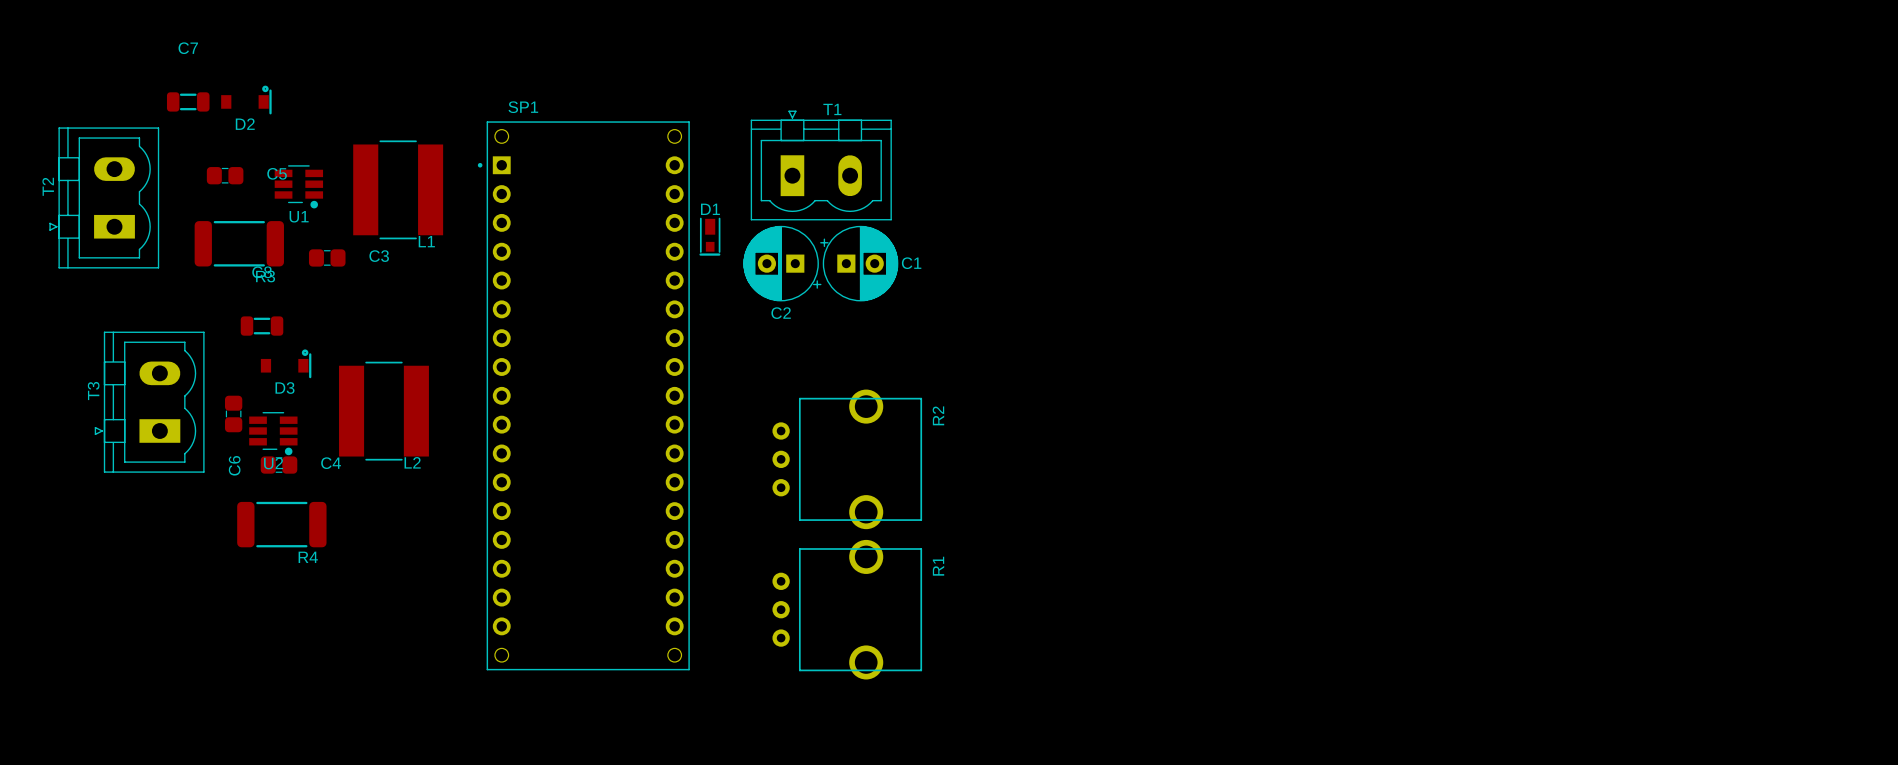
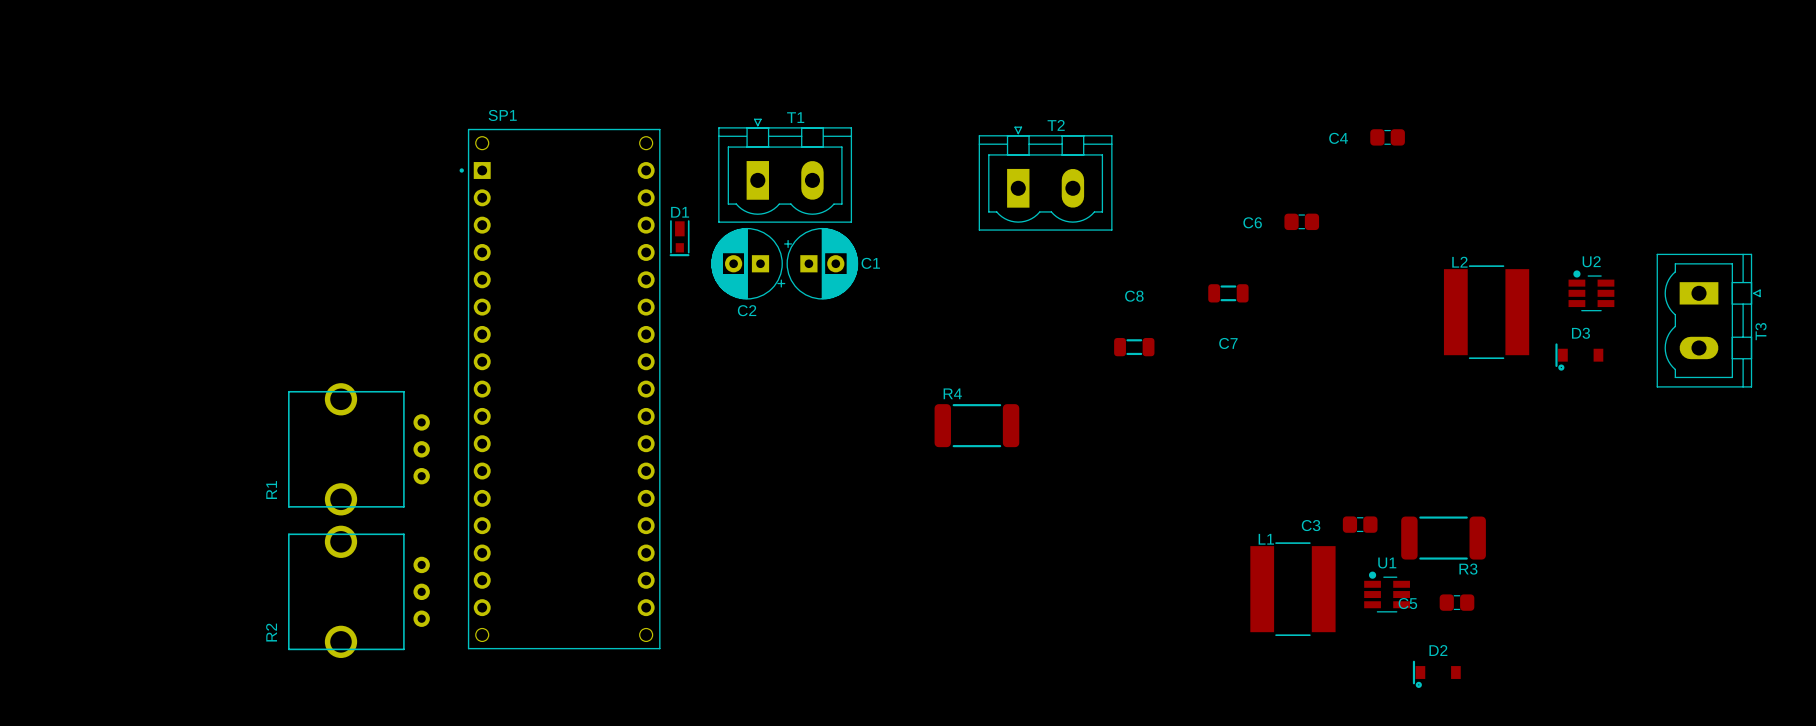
C7 name position: C7 (188, 48) -> C7 (1228, 343)
D2 rotation: 0° (246, 100) -> 180° (1436, 674)
D2 position: (246, 100) -> (1436, 674)
C7 position: (188, 101) -> (1228, 293)
C5 name position: C5 (277, 173) -> C5 (1407, 603)
C5 position: (225, 175) -> (1456, 602)
U1 rotation: 0° (298, 186) -> 180° (1387, 592)
U1 position: (298, 186) -> (1387, 592)
L1 position: (398, 189) -> (1292, 589)
T2 rotation: 0° (104, 197) -> 90° clockwise (1045, 178)
T2 position: (104, 197) -> (1045, 178)
L1 name position: L1 (426, 241) -> L1 (1266, 539)
R3 position: (239, 243) -> (1443, 538)
C3 name position: C3 (379, 256) -> C3 (1311, 525)
C3 position: (327, 257) -> (1360, 524)
C8 position: (262, 326) -> (1134, 347)
D3 rotation: 0° (286, 363) -> 180° (1579, 357)
D3 position: (286, 363) -> (1579, 357)
T3 rotation: 0° (149, 402) -> 180° (1708, 320)
T3 position: (149, 402) -> (1708, 320)
L2 position: (383, 411) -> (1486, 312)
C6 rotation: 0° (233, 413) -> 90° clockwise (1301, 221)
C6 position: (233, 413) -> (1301, 221)
U2 rotation: 0° (273, 433) -> 180° (1591, 290)
U2 position: (273, 433) -> (1591, 290)
R2 rotation: 0° (847, 459) -> 180° (358, 591)
R2 position: (847, 459) -> (358, 591)
L2 name position: L2 (412, 462) -> L2 (1459, 262)
C4 name position: C4 (331, 463) -> C4 (1338, 138)
C4 position: (279, 465) -> (1387, 137)
R4 position: (281, 524) -> (976, 425)
R4 name position: R4 (308, 557) -> R4 (952, 393)
R1 rotation: 0° (847, 609) -> 180° (358, 449)
R1 position: (847, 609) -> (358, 449)

